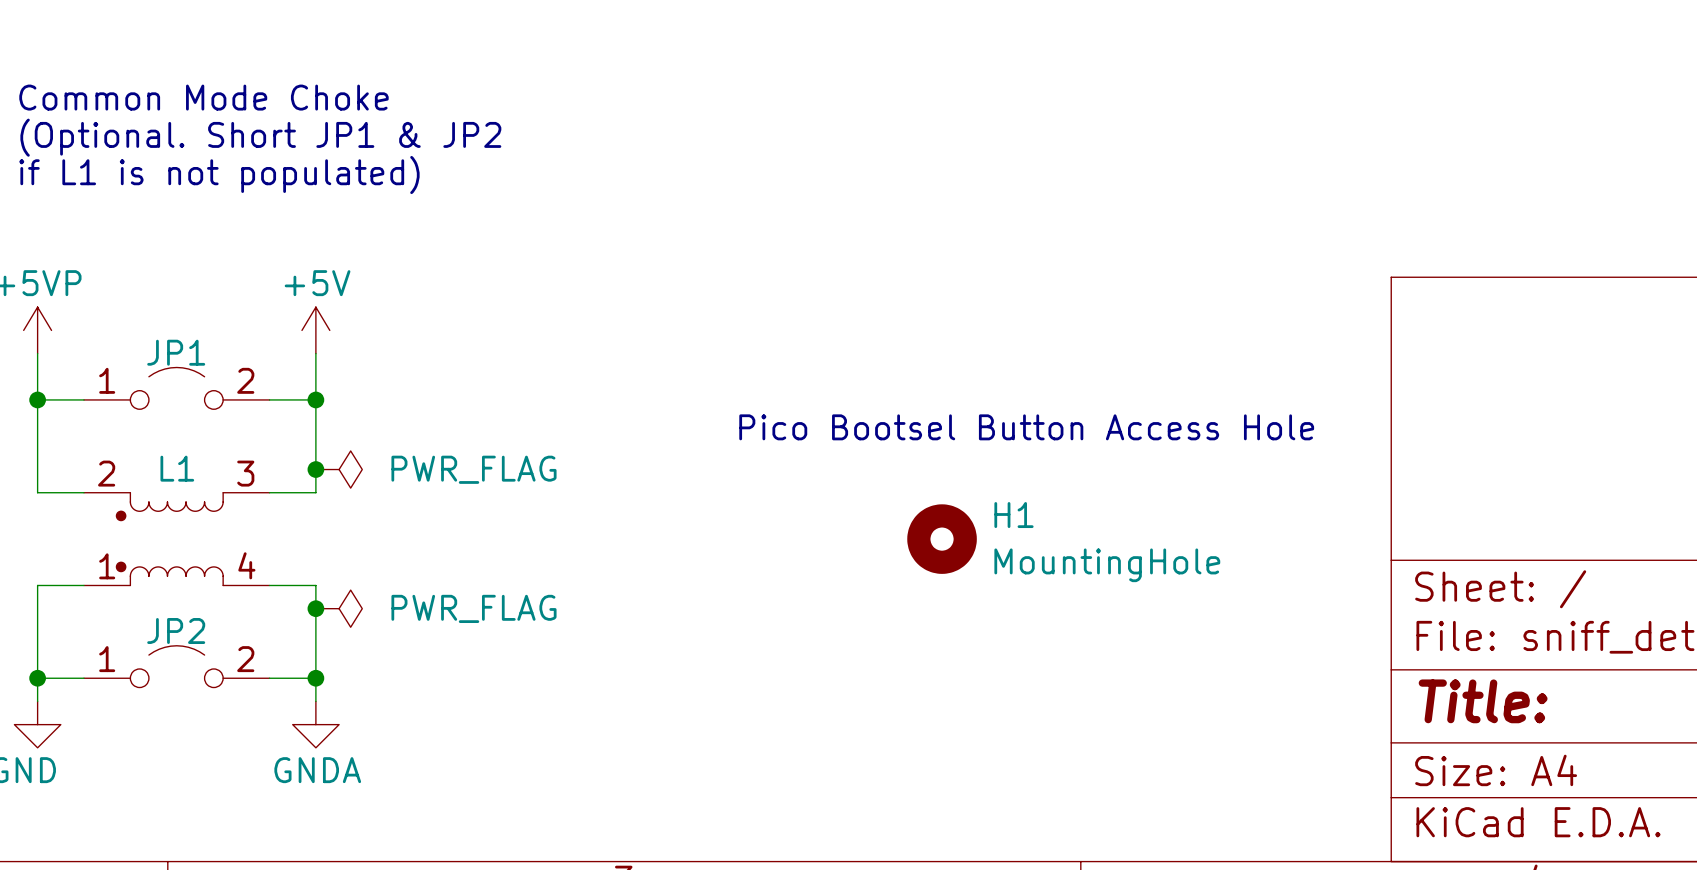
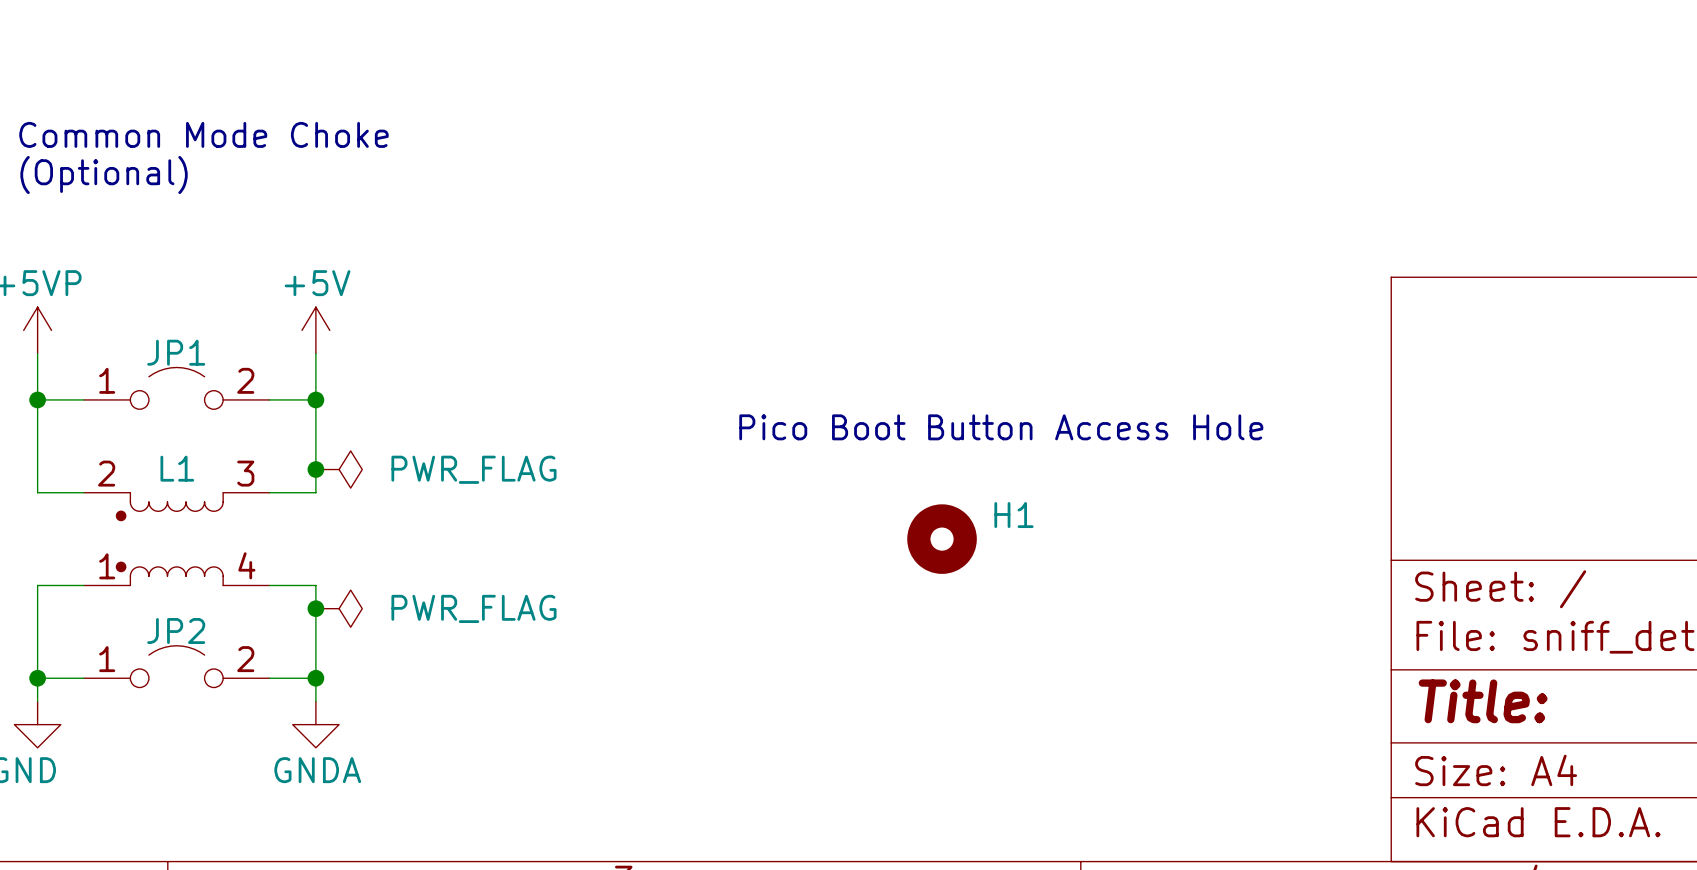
text: Common Mode Choke (203, 97) -> none
text: (Optional. Short JP1 & JP2 (260, 137) -> Common Mode Choke (203, 134)
text: if L1 is not populated) (219, 175) -> (Optional) (104, 175)
text: Pico Bootsel Button Access Hole (1026, 427) -> Pico Boot Button Access Hole (1001, 427)
H1 value: MountingHole (1107, 565) -> none

